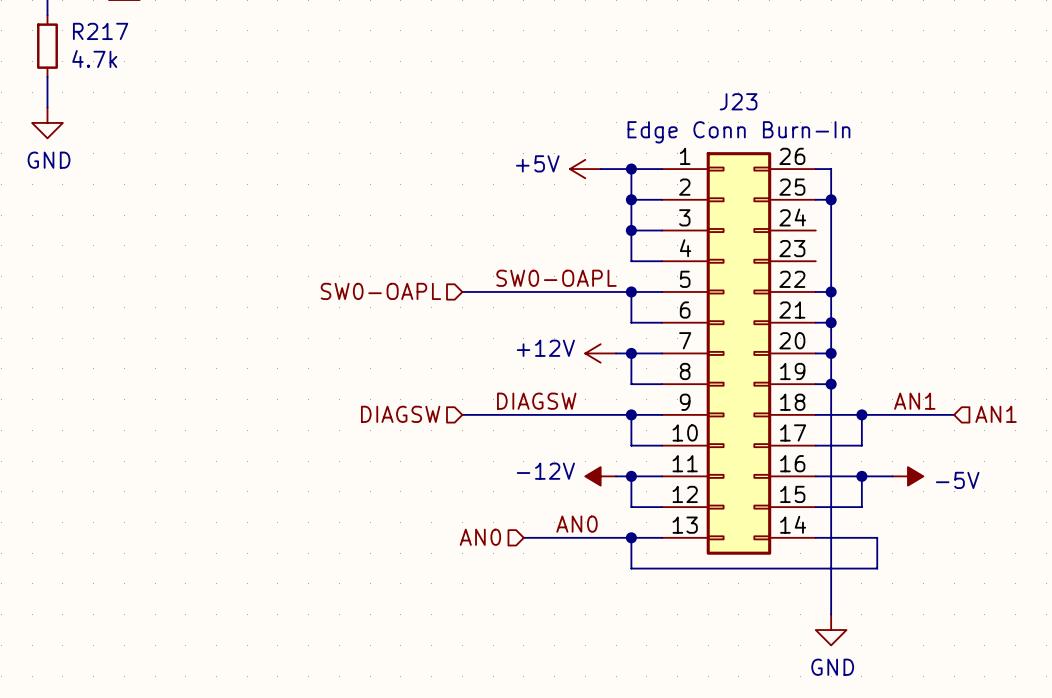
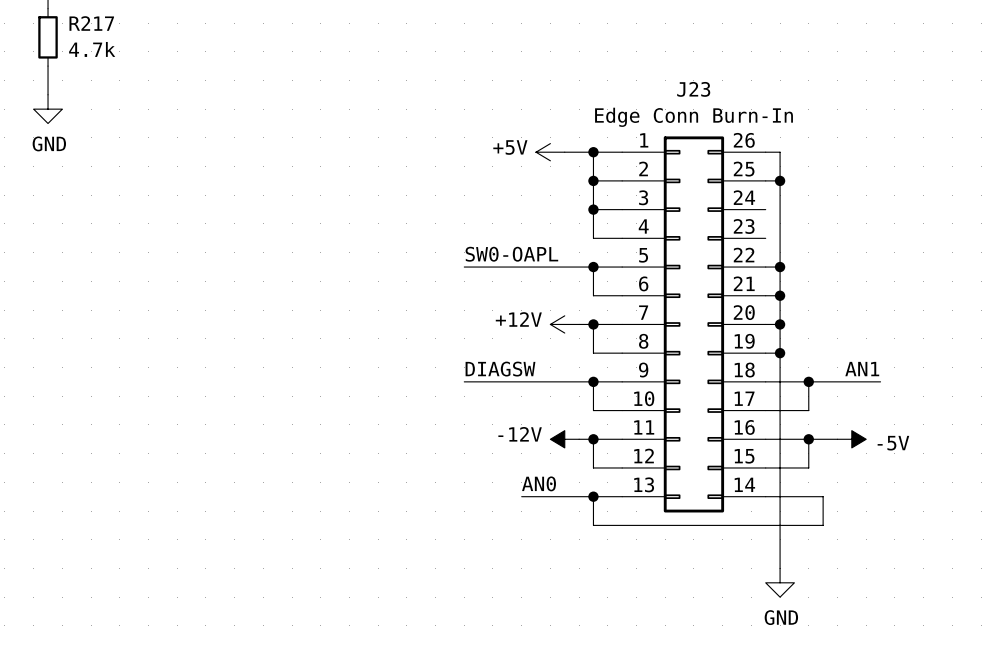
hierarchical label: SW0-OAPL (380, 291) -> none
wire: (462, 291) (493, 291) -> none
hierarchical label: DIAGSW (400, 414) -> none
wire: (462, 414) (493, 414) -> none
wire: (938, 414) (954, 414) -> none
hierarchical label: AN1 (996, 414) -> none
hierarchical label: AN0 (480, 537) -> none
wire: (523, 537) (554, 537) -> none

